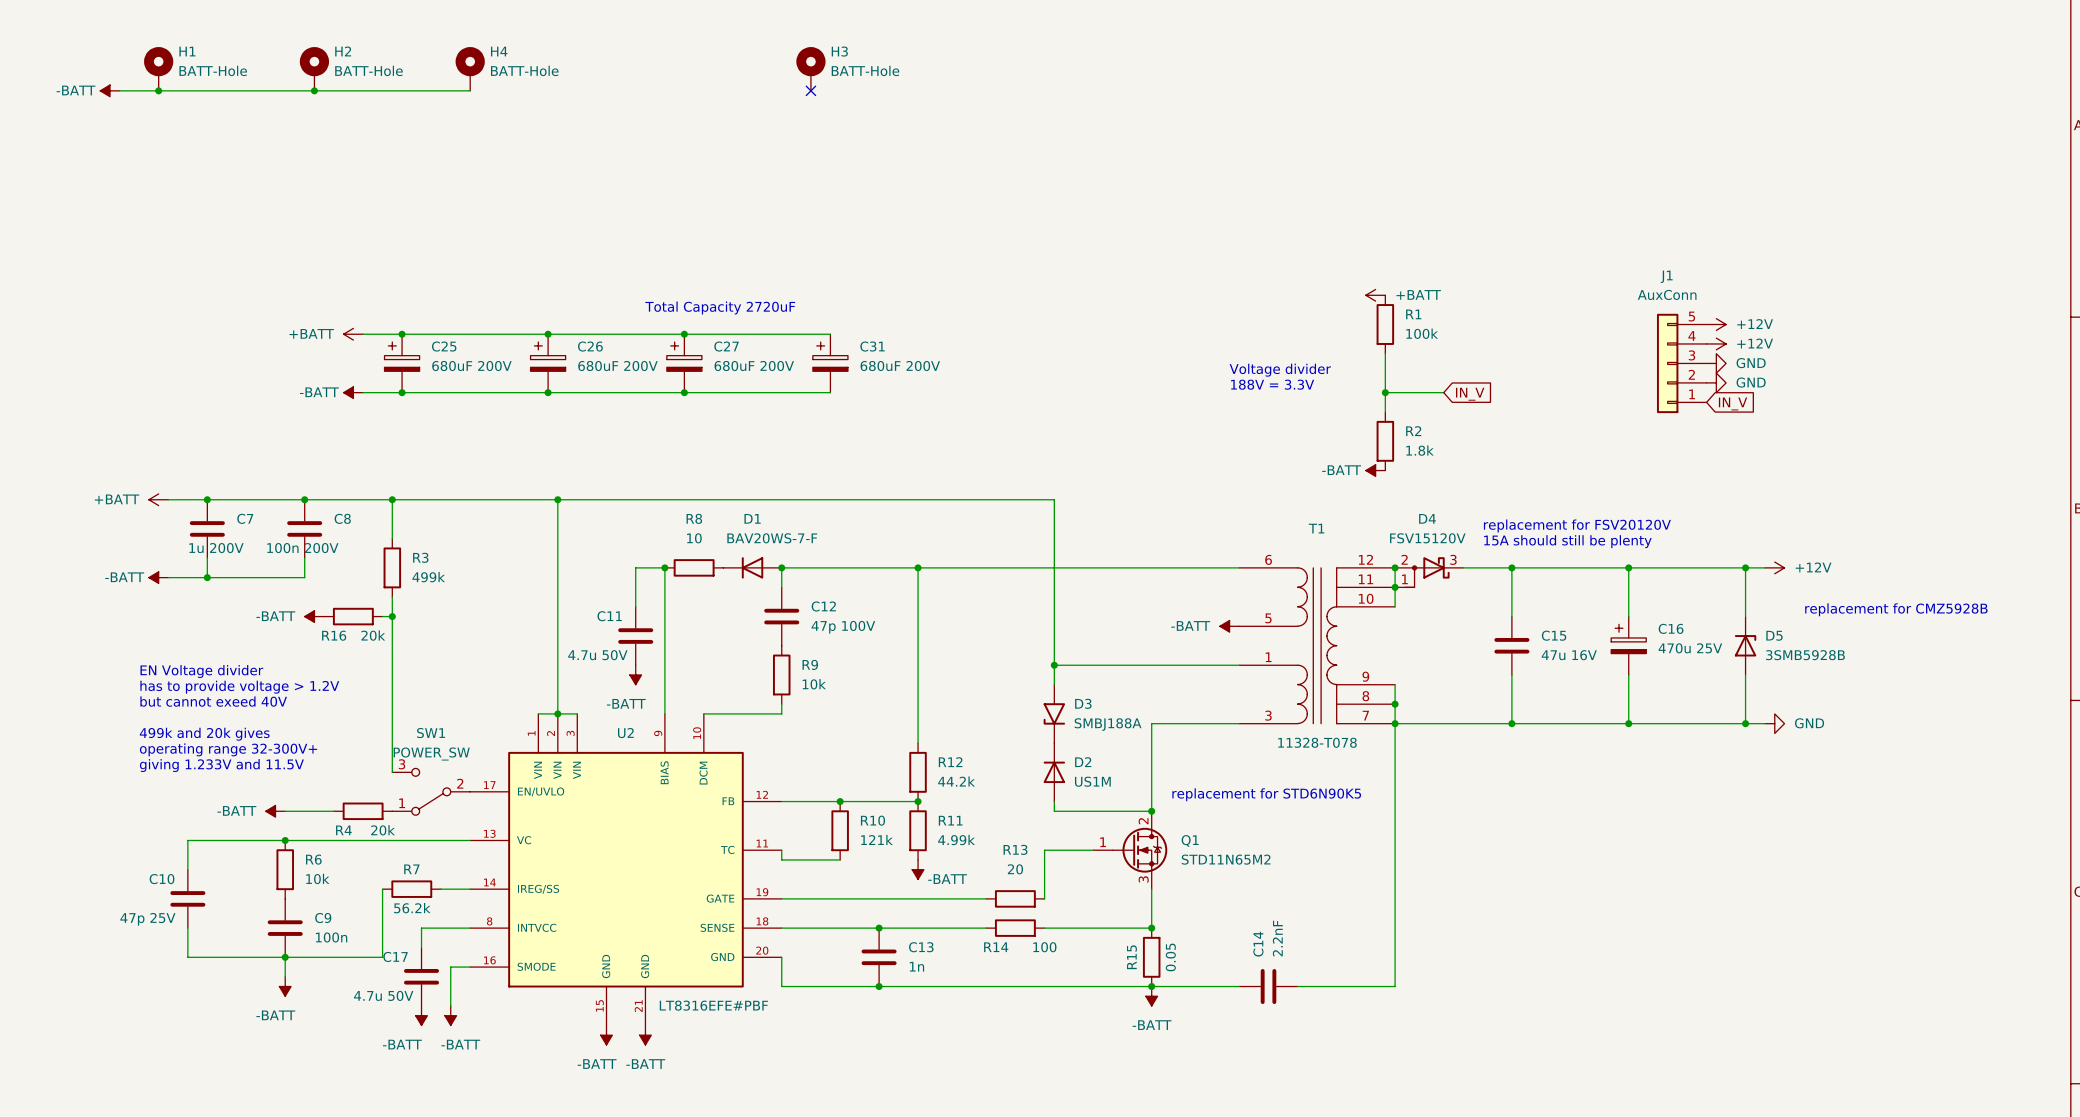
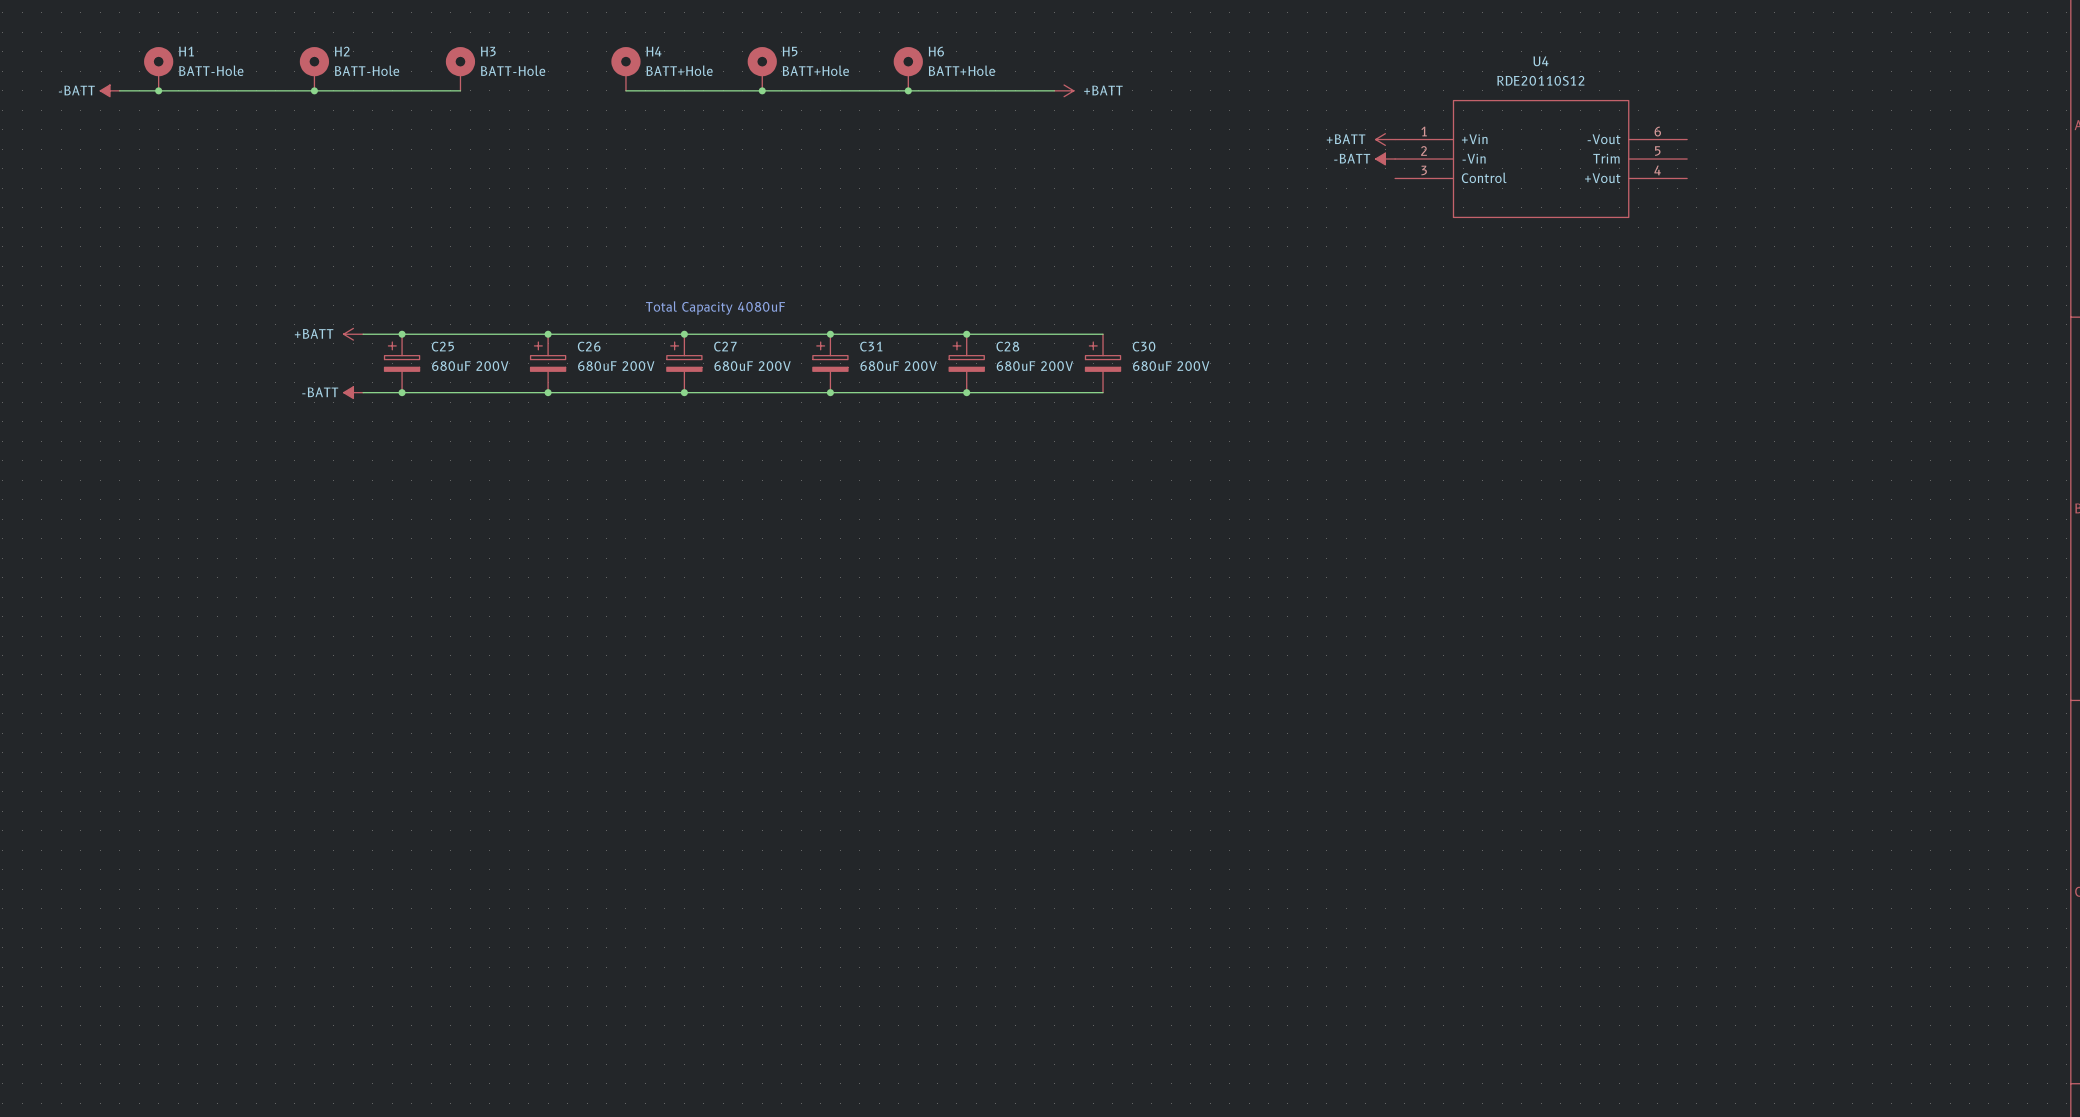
H4 position: (470, 68) -> (625, 68)
H5: none -> BATT+Hole (762, 68)
H3 position: (810, 68) -> (460, 68)
H6: none -> BATT+Hole (908, 68)
H4 value: BATT-Hole (524, 70) -> BATT+Hole (679, 70)
wire: (460, 90) (470, 90) -> none
wire: none -> (625, 90) (1054, 90)
junction: none -> (762, 90)
no-connect mark: (810, 90) -> none
junction: none -> (908, 90)
power symbol: none -> +BATT (1064, 90)
power symbol: none -> -BATT (1385, 159)
U4: none -> RDE20110S12 (1541, 159)
power symbol text position: +BATT (1418, 294) -> +BATT (1346, 139)
power symbol position: +BATT (1375, 295) -> +BATT (1385, 139)
text: Total Capacity 2720uF (720, 307) -> Total Capacity 4080uF (715, 308)
R1: 100k (1385, 324) -> none
power symbol: +12V (1716, 324) -> none
wire: none -> (830, 334) (1103, 334)
junction: none -> (830, 334)
junction: none -> (966, 334)
power symbol: +12V (1716, 343) -> none
wire: (1385, 353) (1385, 412) -> none
C28: none -> 680uF 200V (966, 363)
C30: none -> 680uF 200V (1103, 363)
J1: AuxConn (1681, 363) -> none
power symbol: GND (1716, 363) -> none
text: Voltage divider (1280, 370) -> none
power symbol: GND (1716, 382) -> none
text: 188V = 3.3V (1272, 384) -> none
wire: none -> (830, 392) (1103, 392)
junction: none -> (830, 392)
junction: none -> (966, 392)
wire: (1385, 392) (1443, 392) -> none
junction: (1385, 392) -> none
global label: IN_V (1470, 394) -> none
global label: IN_V (1733, 403) -> none
R2: 1.8k (1385, 441) -> none
power symbol: -BATT (1375, 470) -> none
power symbol: +BATT (158, 499) -> none
wire: (168, 499) (1054, 499) (1054, 684) -> none
junction: (207, 499) -> none
junction: (304, 499) -> none
wire: (392, 499) (392, 538) -> none
junction: (392, 499) -> none
wire: (557, 499) (557, 713) -> none
junction: (557, 499) -> none
text: replacement for FSV20120V (1577, 525) -> none
C7: 1u 200V (207, 528) -> none
C8: 100n 200V (304, 528) -> none
text: 15A should still be plenty (1567, 541) -> none
wire: (207, 558) (207, 577) -> none
wire: (304, 558) (304, 577) (168, 577) -> none
R3: 499k (392, 567) -> none
junction: (664, 567) -> none
R8: 10 (694, 567) -> none
D1: BAV20WS-7-F (752, 567) -> none
junction: (781, 567) -> none
wire: (918, 567) (918, 743) -> none
junction: (918, 567) -> none
wire: (1239, 567) (781, 567) (781, 587) -> none
wire: (1395, 567) (1395, 606) -> none
junction: (1395, 567) -> none
wire: (1463, 567) (1765, 567) -> none
wire: (1511, 567) (1511, 616) -> none
junction: (1511, 567) -> none
wire: (1628, 567) (1628, 616) -> none
junction: (1628, 567) -> none
wire: (1745, 567) (1745, 616) -> none
junction: (1745, 567) -> none
power symbol: +12V (1774, 567) -> none
D4: FSV15120V (1429, 572) -> none
power symbol: -BATT (158, 577) -> none
junction: (207, 577) -> none
junction: (1395, 587) -> none
wire: (392, 597) (392, 772) -> none
wire: (635, 606) (635, 567) (664, 567) (664, 713) -> none
text: replacement for CMZ5928B (1896, 609) -> none
power symbol: -BATT (314, 616) -> none
R16: 20k (353, 616) -> none
wire: (382, 616) (392, 616) -> none
junction: (392, 616) -> none
C12: 47p 100V (781, 616) -> none
power symbol: -BATT (1229, 626) -> none
C11: 4.7u 50V (635, 636) -> none
T1: 11328-T078 (1317, 645) -> none
C15: 47u 16V (1511, 645) -> none
C16: 470u 25V (1628, 645) -> none
D5: 3SMB5928B (1745, 645) -> none
wire: (1054, 665) (1239, 665) -> none
junction: (1054, 665) -> none
text: EN Voltage divider (201, 671) -> none
power symbol: -BATT (635, 674) -> none
R9: 10k (781, 674) -> none
wire: (1511, 674) (1511, 723) -> none
wire: (1628, 674) (1628, 723) -> none
wire: (1745, 674) (1745, 723) -> none
wire: (1395, 684) (1395, 986) (1297, 986) -> none
text: has to provide voltage > 1.2V (239, 687) -> none
text: but cannot exeed 40V (213, 701) -> none
wire: (781, 704) (781, 713) (703, 713) -> none
junction: (1395, 704) -> none
wire: (538, 713) (577, 713) -> none
junction: (557, 713) -> none
D3: SMBJ188A (1054, 713) -> none
wire: (1239, 723) (1151, 723) (1151, 811) (1054, 811) (1054, 801) -> none
wire: (1395, 723) (1765, 723) -> none
junction: (1395, 723) -> none
junction: (1511, 723) -> none
junction: (1628, 723) -> none
junction: (1745, 723) -> none
power symbol: GND (1774, 723) -> none
text: 499k and 20k gives (204, 734) -> none
text: operating range 32-300V+ (228, 749) -> none
text: giving 1.233V and 11.5V (221, 765) -> none
R12: 44.2k (918, 772) -> none
D2: US1M (1054, 772) -> none
SW1: POWER_SW (431, 791) -> none
text: replacement for STD6N90K5 (1266, 794) -> none
wire: (781, 801) (918, 801) -> none
junction: (840, 801) -> none
junction: (918, 801) -> none
power symbol: -BATT (275, 811) -> none
wire: (285, 811) (333, 811) -> none
R4: 20k (363, 811) -> none
junction: (1151, 811) -> none
R10: 121k (840, 830) -> none
R11: 4.99k (918, 830) -> none
junction: (285, 840) -> none
wire: (470, 840) (187, 840) (187, 869) -> none
wire: (781, 850) (781, 859) (840, 859) -> none
wire: (1093, 850) (1044, 850) (1044, 898) -> none
Q1: STD11N65M2 (1130, 850) -> none
R6: 10k (285, 869) -> none
U2: LT8316EFE#PBF (625, 869) -> none
power symbol: -BATT (918, 869) -> none
wire: (382, 889) (382, 957) (187, 957) (187, 928) -> none
R7: 56.2k (411, 889) -> none
wire: (440, 889) (470, 889) -> none
wire: (1151, 889) (1151, 928) (1044, 928) -> none
C10: 47p 25V (187, 898) -> none
wire: (781, 898) (986, 898) -> none
R13: 20 (1015, 898) -> none
C9: 100n (285, 928) -> none
wire: (470, 928) (421, 928) (421, 947) -> none
wire: (781, 928) (986, 928) -> none
junction: (879, 928) -> none
R14: 100 (1015, 928) -> none
junction: (1151, 928) -> none
wire: (285, 957) (285, 976) -> none
junction: (285, 957) -> none
wire: (781, 957) (781, 986) (1239, 986) -> none
C13: 1n (879, 957) -> none
R15: 0.05 (1151, 957) -> none
wire: (470, 967) (450, 967) (450, 1006) -> none
C17: 4.7u 50V (421, 976) -> none
power symbol: -BATT (285, 986) -> none
junction: (879, 986) -> none
junction: (1151, 986) -> none
C14: 2.2nF (1268, 986) -> none
power symbol: -BATT (1151, 996) -> none
power symbol: -BATT (421, 1015) -> none
power symbol: -BATT (450, 1015) -> none
power symbol: -BATT (606, 1035) -> none
power symbol: -BATT (645, 1035) -> none

